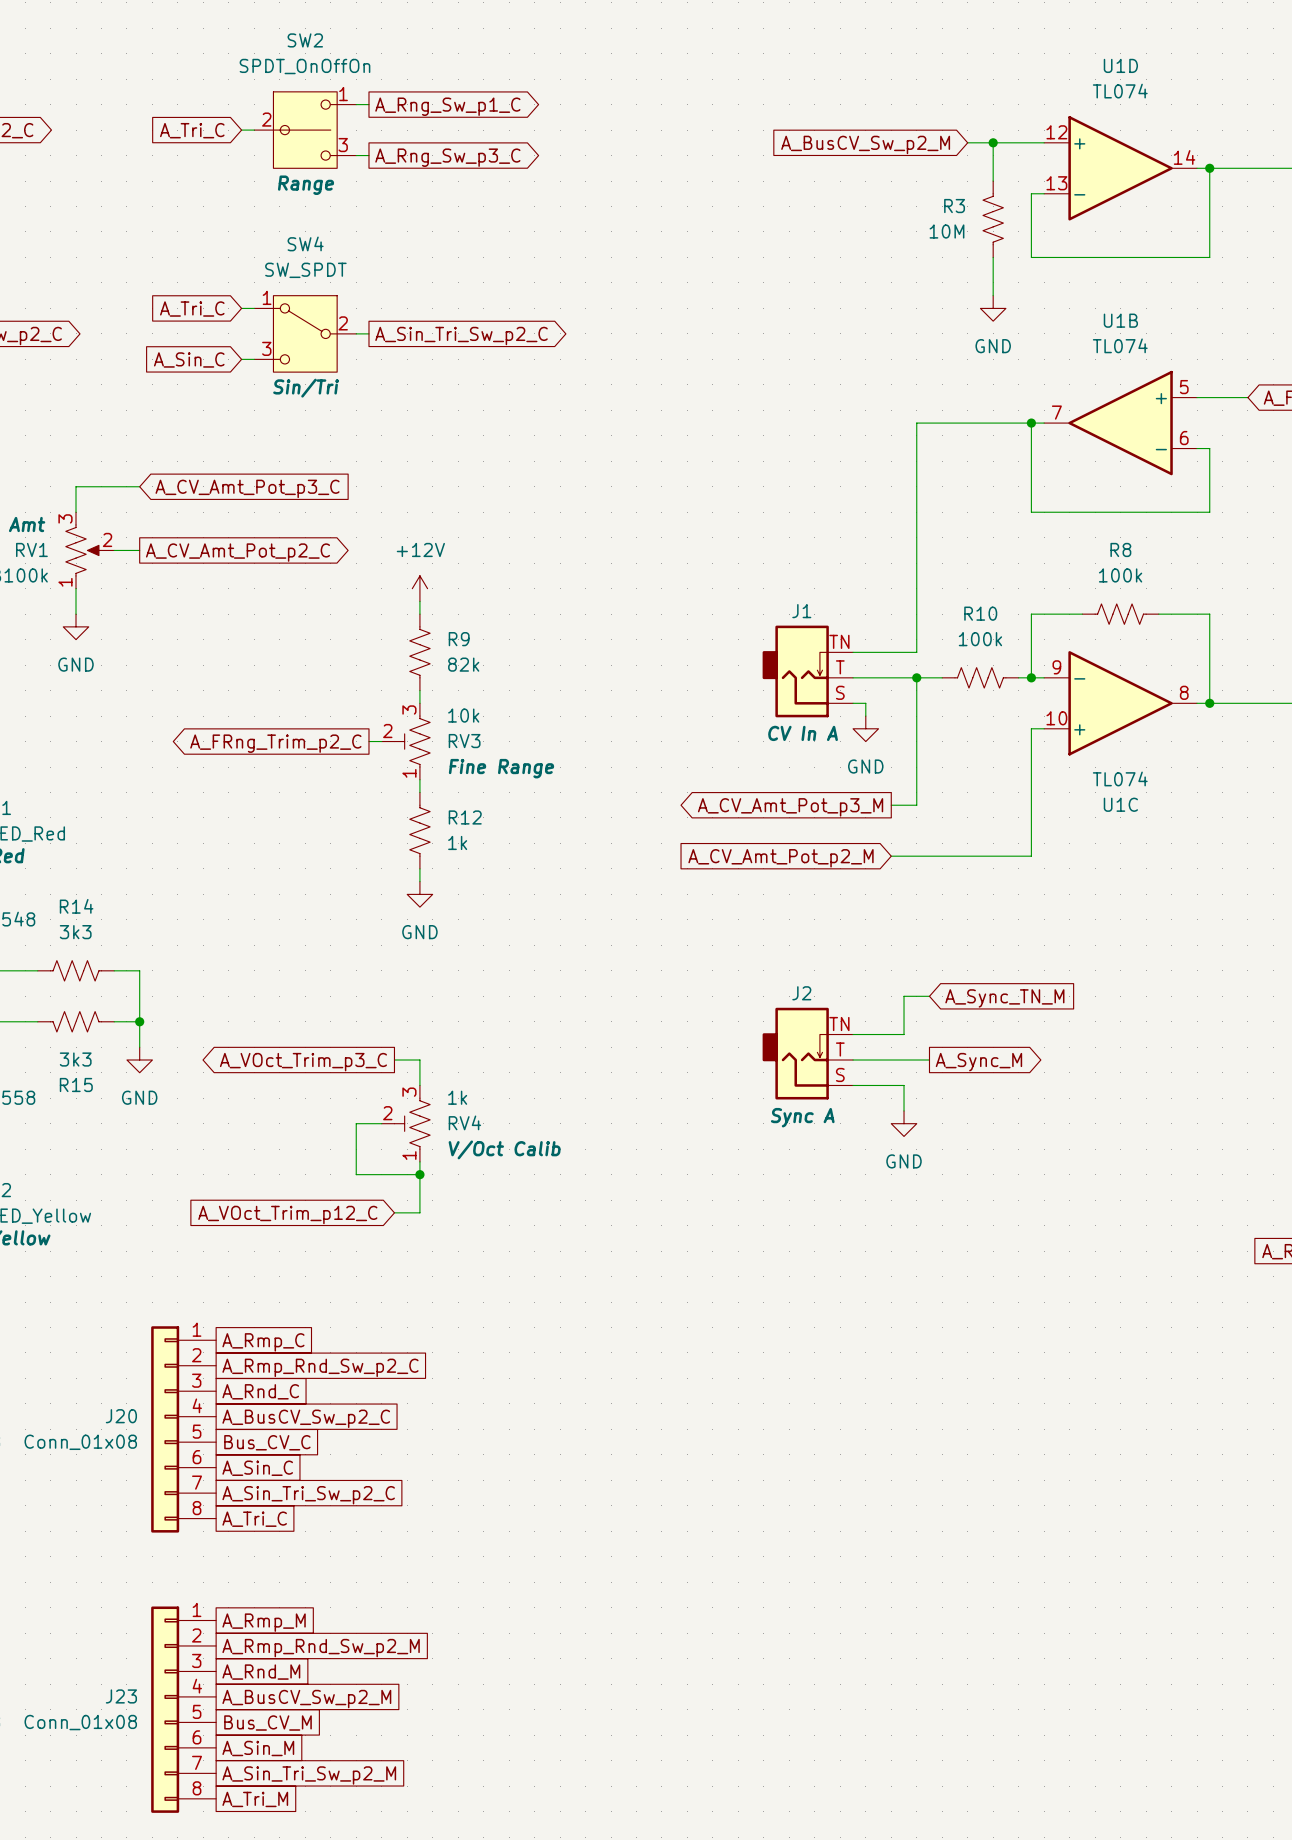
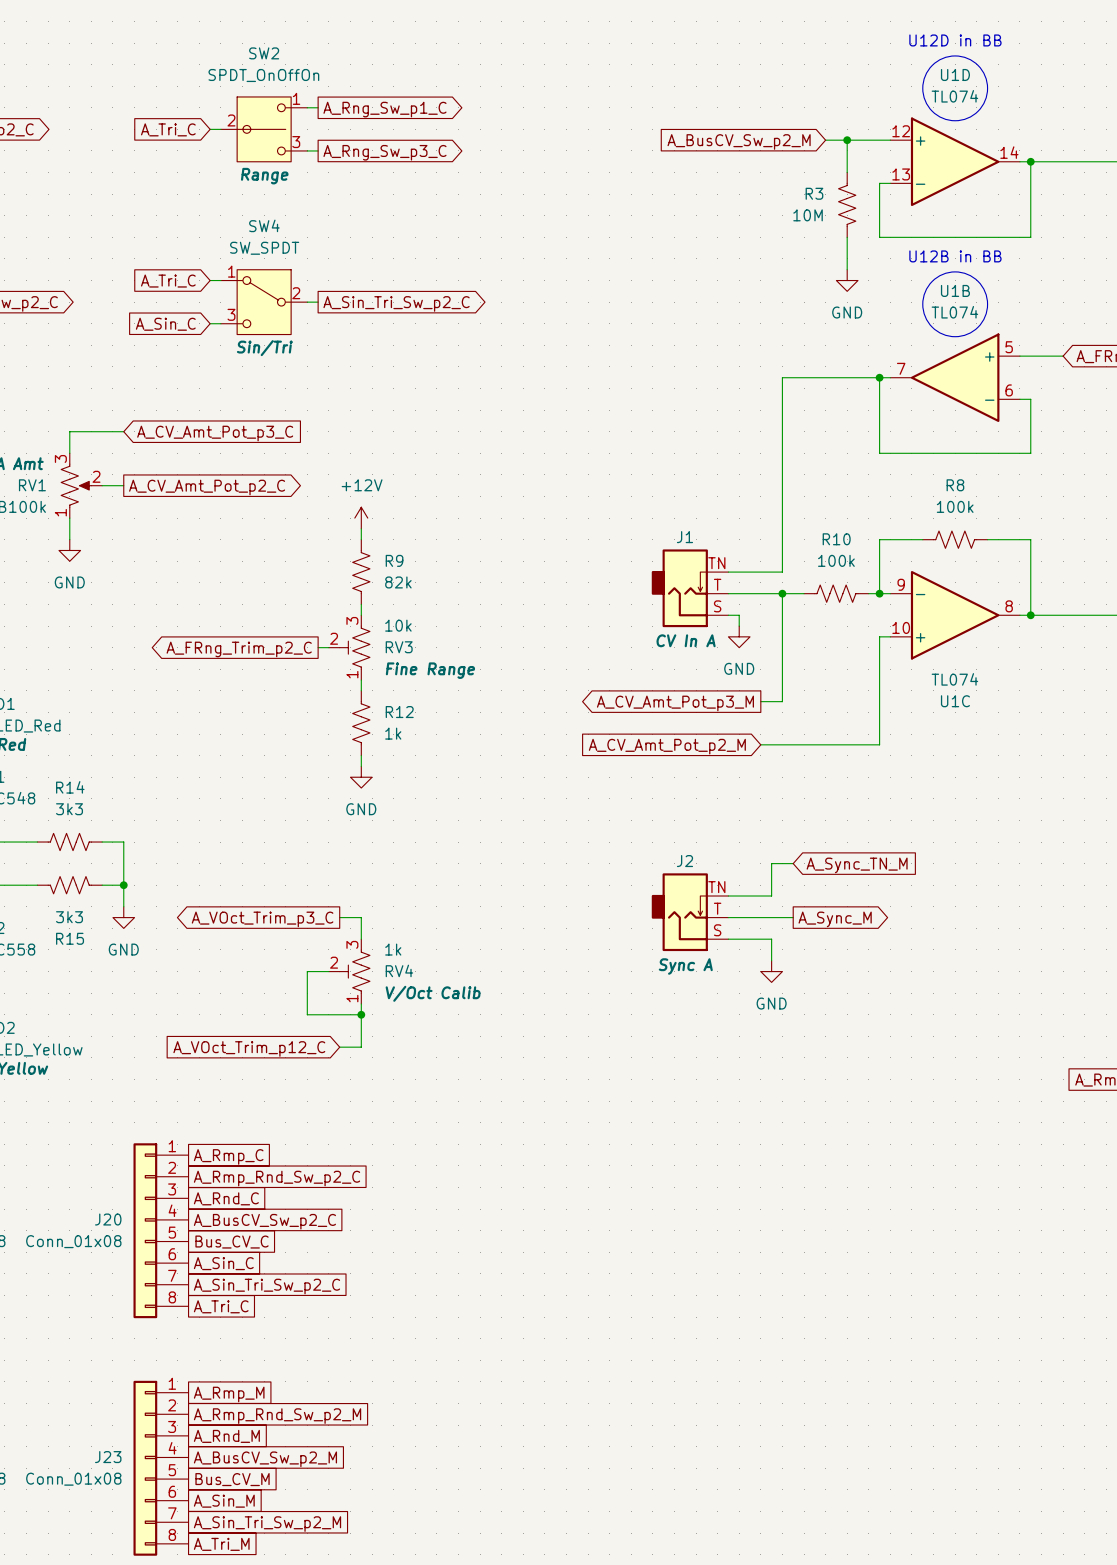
text: none -> U12D in BB (955, 40)
drawing: none -> [922, 55, 988, 121]
text: none -> U12B in BB (955, 256)
drawing: none -> [922, 271, 988, 337]

